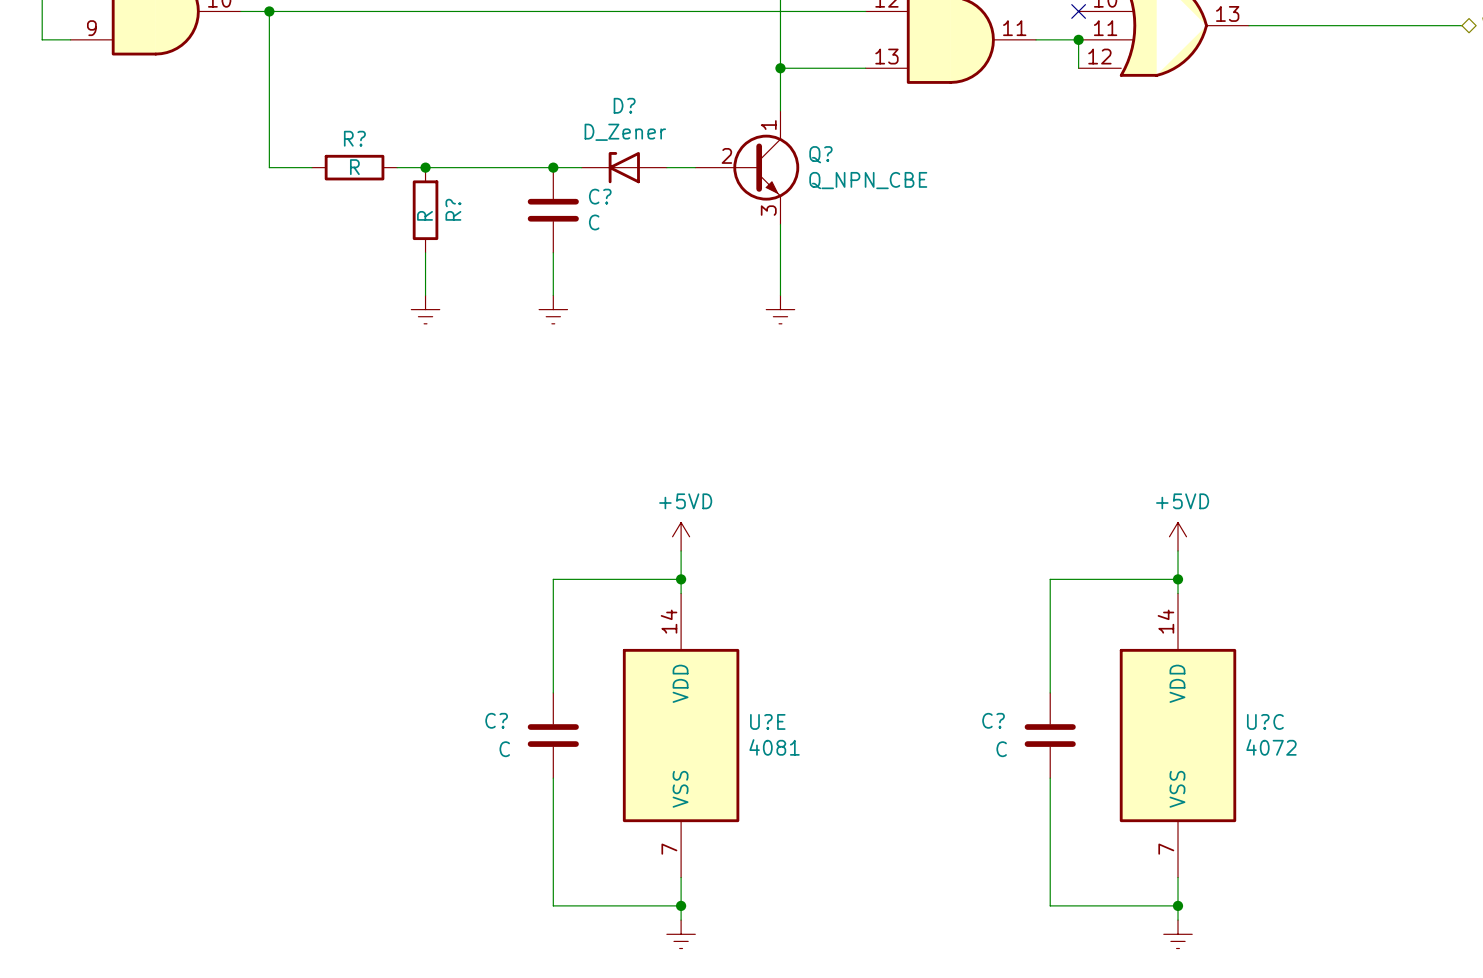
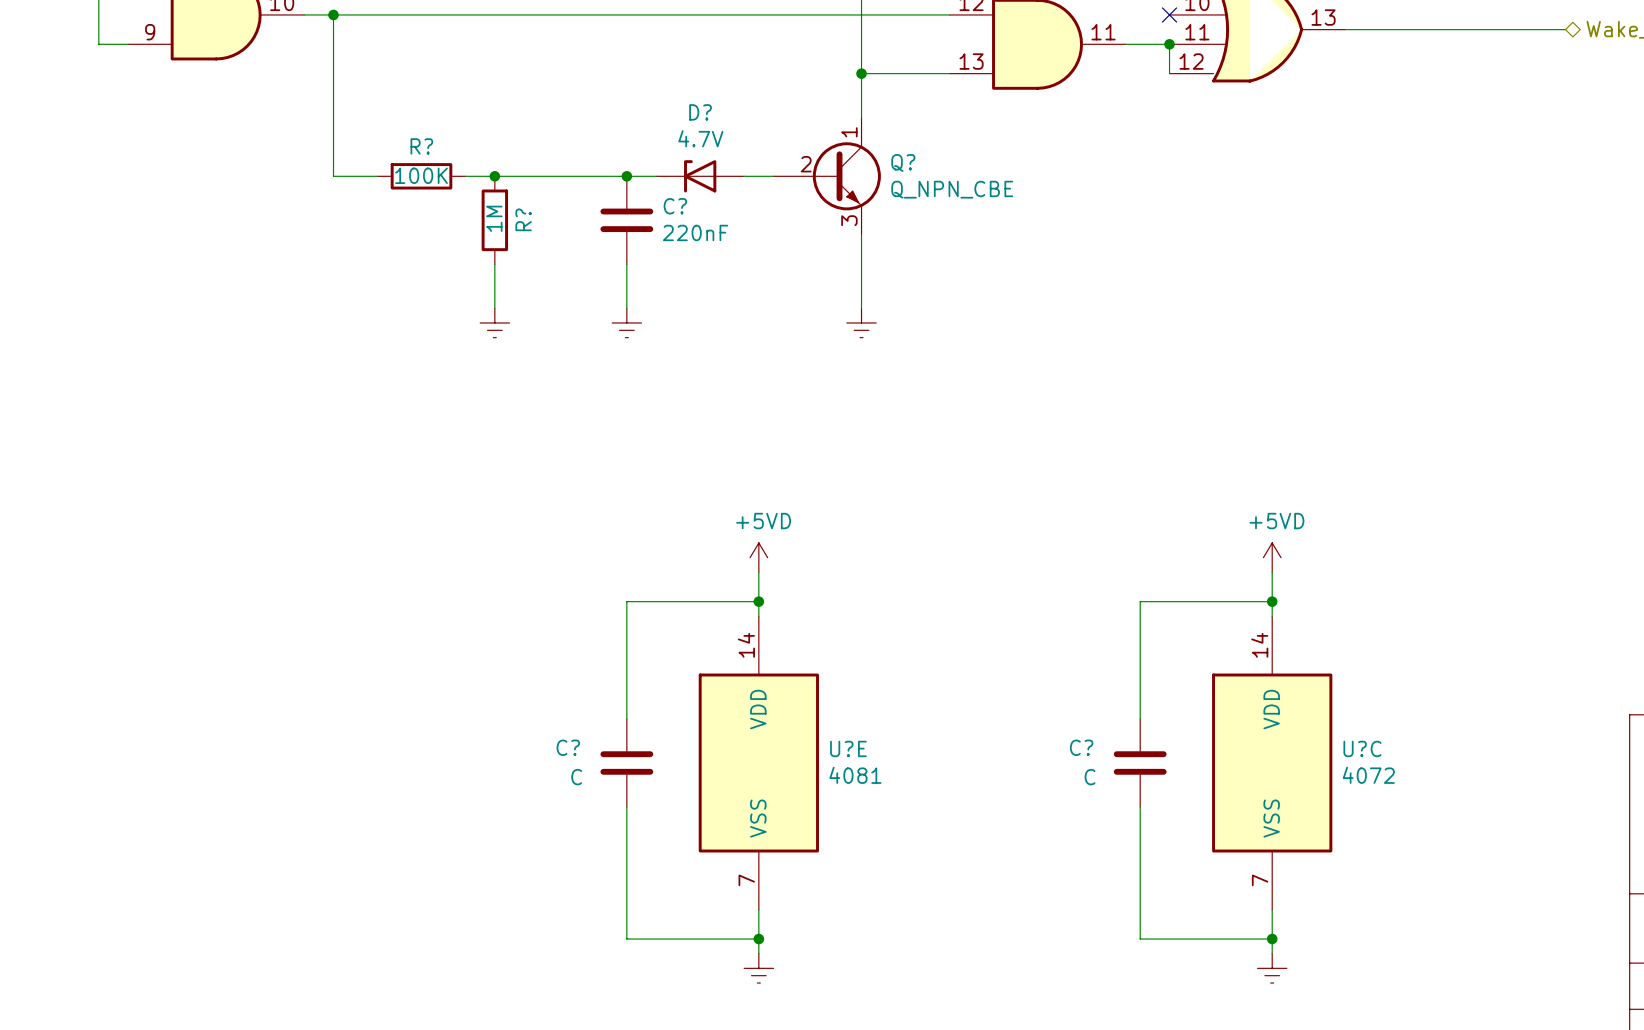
D? value: D_Zener (625, 132) -> 4.7V (700, 138)
R? value: R (354, 167) -> 100K (421, 175)
R? value: R (425, 215) -> 1M (494, 218)
C? value: C (594, 222) -> 220nF (695, 232)

